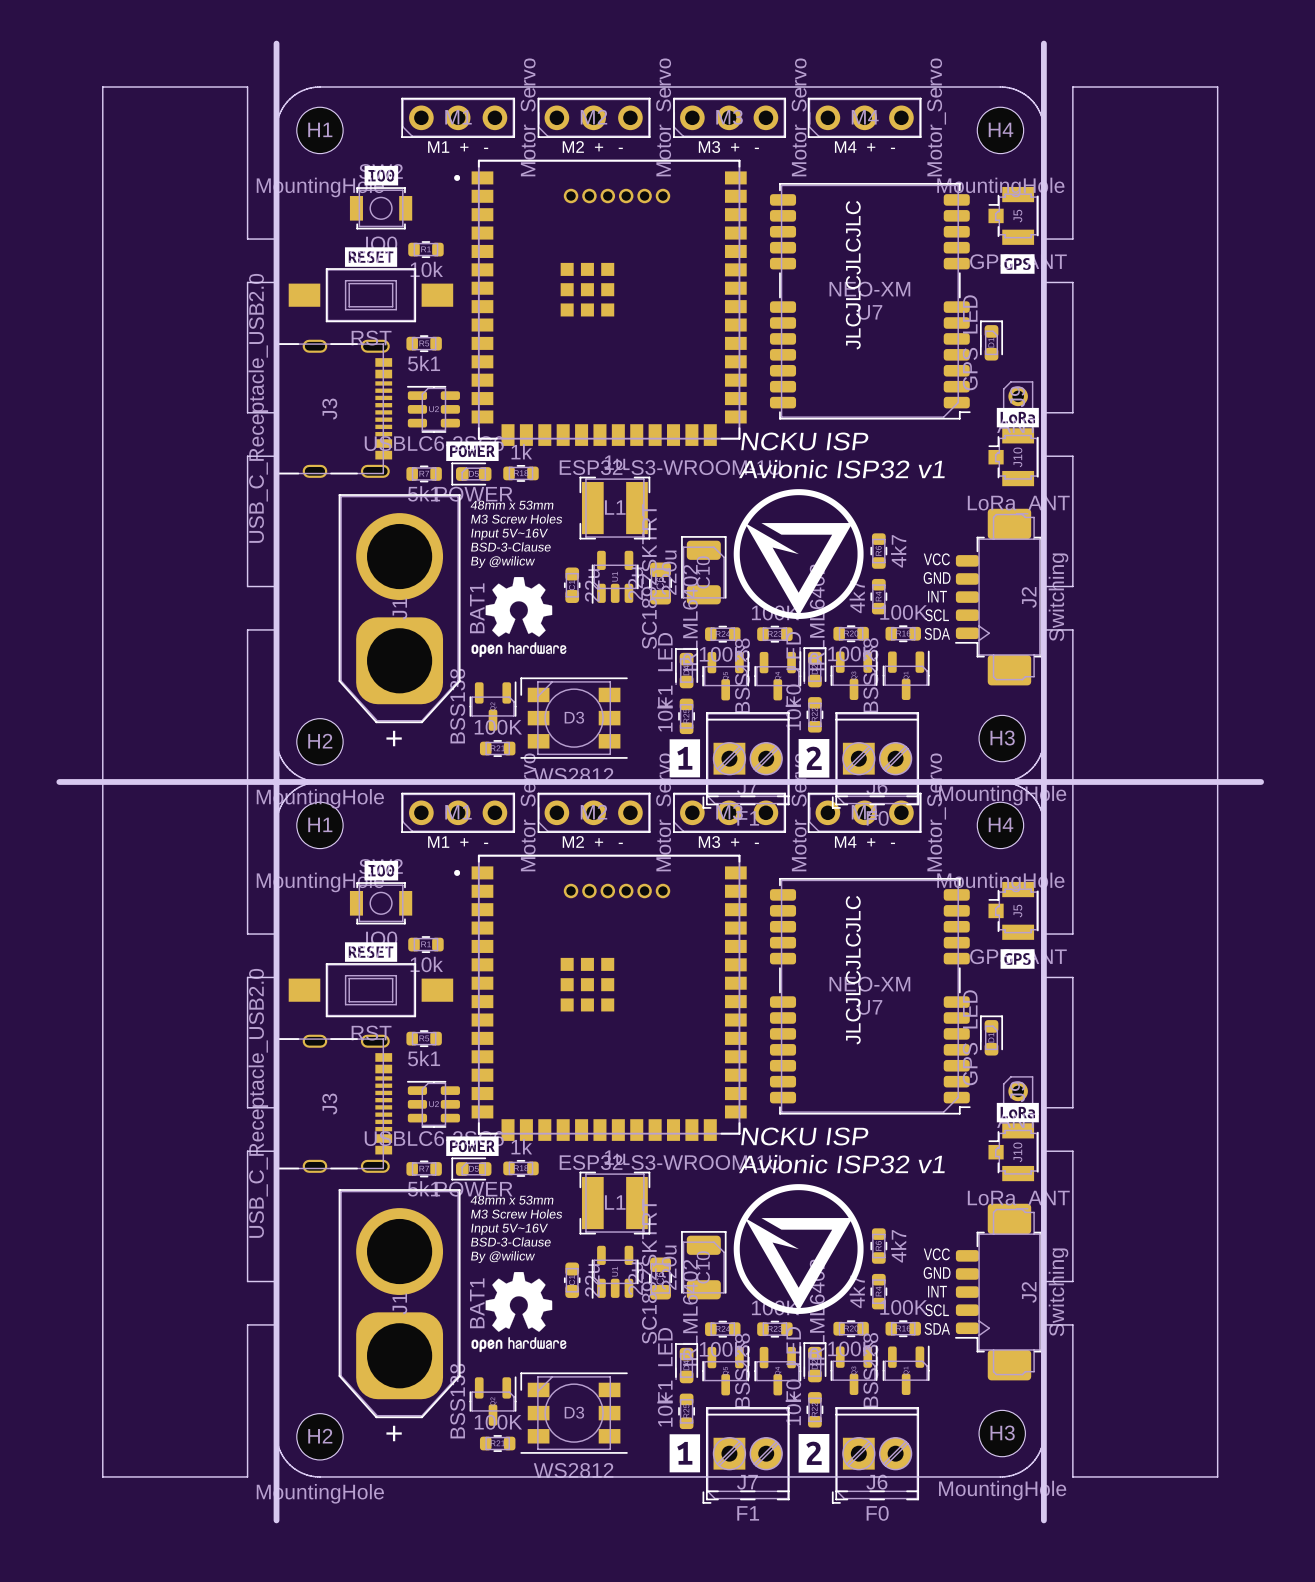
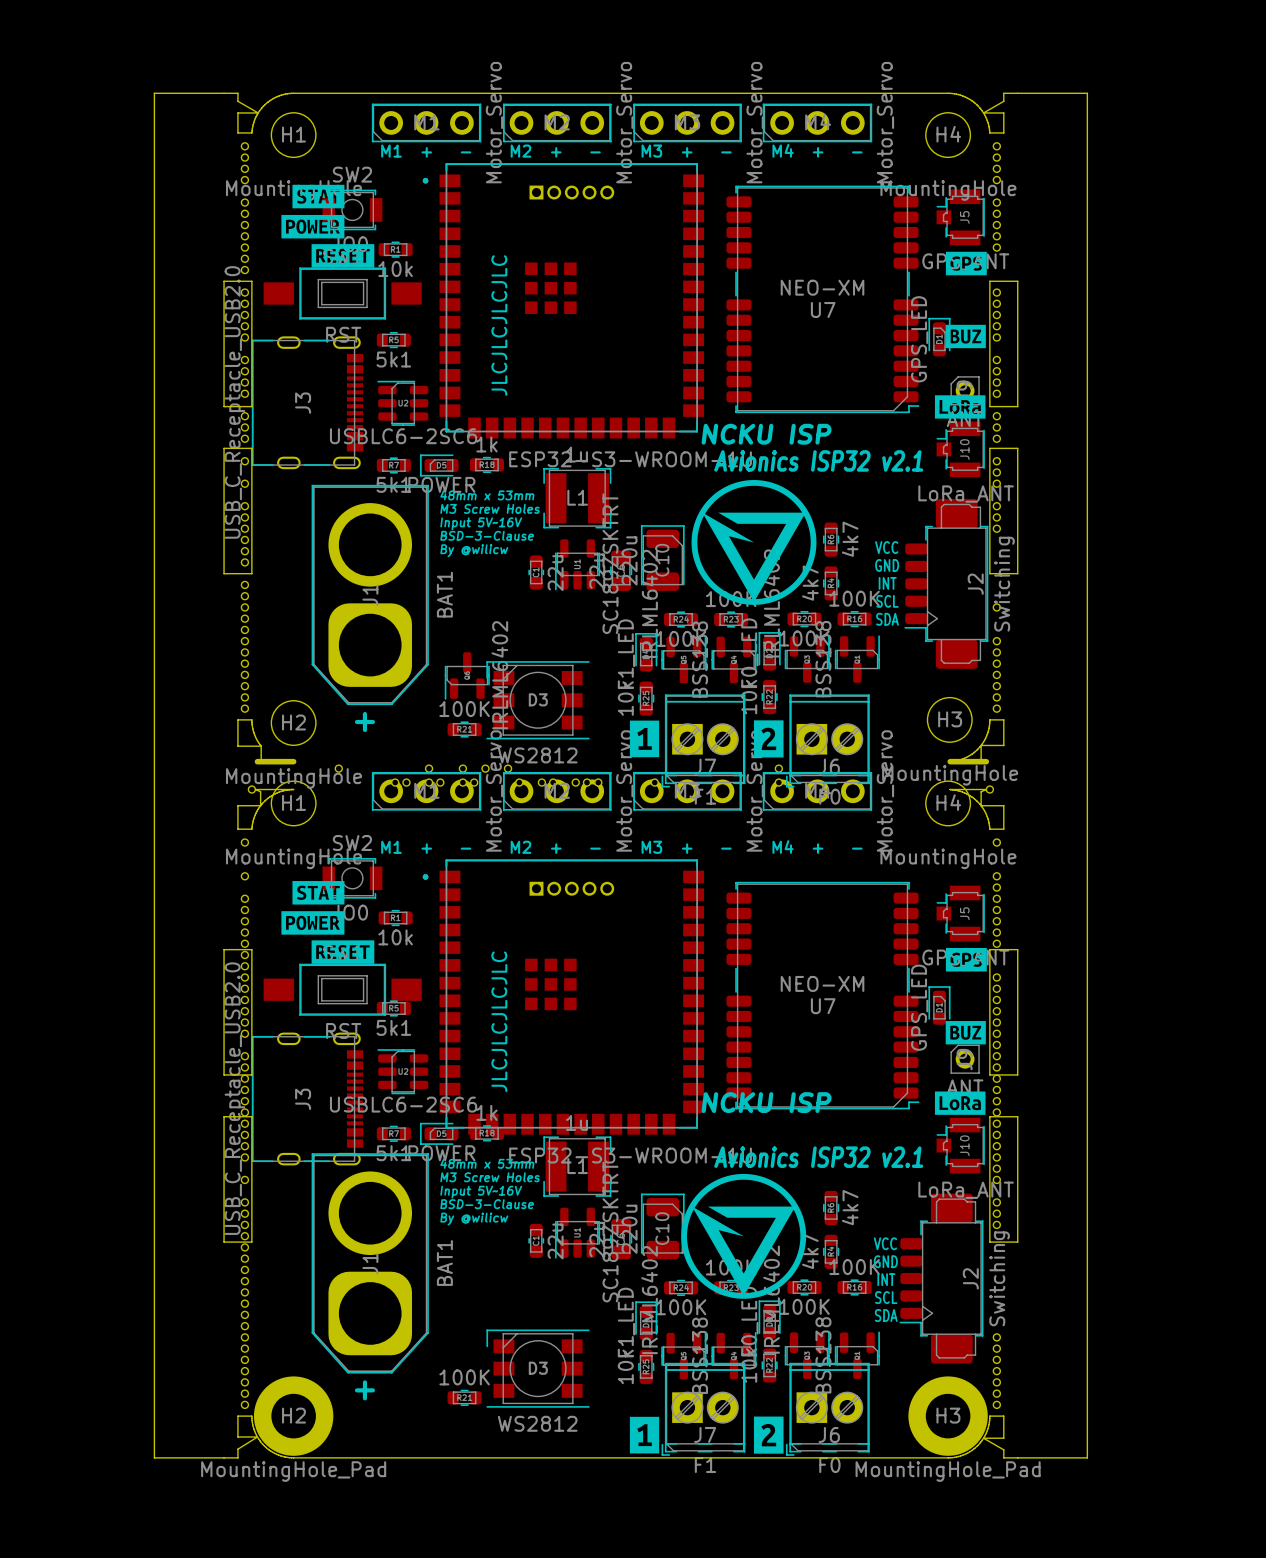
board edge: (276, 43) (276, 1520) -> none
board edge: (1043, 43) (1043, 1520) -> none
board edge: (175, 87) (102, 87) (102, 1476) (247, 1476) (247, 1324) (276, 1324) (277, 1444) (283, 1456) (291, 1466) (302, 1473) (313, 1476) (1009, 1476) (1021, 1471) (1030, 1465) (1038, 1454) (1043, 1442) (1043, 1324) (1072, 1324) (1072, 1476) (1217, 1476) (1217, 87) (1145, 87) -> (154, 93) (154, 1457) (237, 1457) (237, 1449) (257, 1437)
board edge: (247, 87) (247, 239) (276, 239) (276, 128) -> (224, 93) (237, 93) (237, 101) (258, 112) (237, 112) (237, 132) (251, 132)
board edge: (1000, 87) (1013, 89) (1026, 95) (1035, 104) (1042, 119) (1043, 239) (1072, 239) (1072, 87) -> (948, 93) (968, 98) (983, 112)
board edge: none -> (1017, 93) (1003, 93) (1003, 101) (983, 112)
board edge: none -> (1087, 93) (1087, 1457) (1003, 1457) (1003, 1449) (983, 1438)
board edge: none -> (983, 112) (1003, 112) (1003, 132) (989, 132) (983, 112)
part: none -> (244, 146)
part: none -> (996, 146)
part: none -> (244, 157)
part: none -> (996, 157)
part: none -> (244, 168)
drawing: [364, 165, 399, 186] -> none
part: none -> (996, 168)
part: none -> (244, 180)
part: none -> (996, 180)
drawing: none -> [281, 184, 345, 239]
part footprint: [563, 188, 671, 204] -> [529, 185, 615, 200]
part: none -> (244, 202)
part: none -> (996, 202)
part: none -> (244, 213)
part: none -> (996, 213)
part: none -> (244, 225)
part: none -> (996, 225)
part: none -> (244, 236)
part: none -> (996, 236)
part: none -> (244, 247)
drawing shape: [344, 247, 398, 267] -> [311, 244, 375, 268]
part: none -> (996, 247)
drawing shape: [1000, 254, 1035, 274] -> [945, 251, 987, 276]
part: none -> (244, 258)
part: none -> (244, 270)
text position: JLCJLCJLCJLC (853, 275) -> JLCJLCJLCJLC (499, 325)
part: none -> (244, 292)
part: none -> (996, 292)
part: none -> (244, 303)
part: none -> (996, 303)
part: none -> (244, 315)
part: none -> (996, 315)
drawing: none -> [945, 324, 986, 349]
part: none -> (244, 326)
part: none -> (996, 326)
part: none -> (244, 337)
part: none -> (996, 337)
part: none -> (244, 360)
part: none -> (996, 360)
part: none -> (244, 371)
part: none -> (996, 371)
part: none -> (244, 382)
part: none -> (996, 382)
part: none -> (244, 393)
part: none -> (996, 393)
drawing shape: [996, 407, 1039, 428] -> [934, 395, 986, 419]
part: none -> (244, 416)
part: none -> (996, 416)
part: none -> (244, 427)
part: none -> (996, 427)
drawing: [446, 441, 499, 461] -> none
part: none -> (244, 438)
part: none -> (996, 438)
part: none -> (244, 461)
text: Avionic ISP32 v1 (841, 469) -> Avionics ISP32 v2.1 (818, 460)
part: none -> (996, 461)
part: none -> (996, 472)
part: none -> (244, 483)
part: none -> (996, 483)
part: none -> (244, 506)
part: none -> (996, 506)
part: none -> (244, 517)
part: none -> (996, 517)
part: none -> (244, 528)
part: none -> (996, 528)
part: none -> (244, 539)
part: none -> (244, 551)
part: none -> (244, 562)
drawing: [471, 577, 567, 658] -> none
part: none -> (244, 584)
part: none -> (244, 596)
part: none -> (244, 607)
part: none -> (996, 607)
board edge: (247, 629) (247, 934) (276, 934) (277, 814) (284, 800) (293, 791) (304, 784) (317, 782) (302, 778) (291, 771) (283, 761) (277, 749) (276, 629) (247, 629) -> none
part: none -> (244, 618)
part: none -> (244, 629)
part: none -> (244, 641)
part: none -> (996, 641)
part: none -> (244, 652)
part: none -> (996, 652)
part: none -> (244, 663)
part: none -> (996, 663)
part: none -> (244, 674)
part: none -> (996, 674)
part: none -> IRLML6402 (467, 675)
part: none -> (244, 686)
part: none -> (996, 686)
part: BSS138 (493, 706) -> none
part: none -> (244, 697)
part: none -> (996, 697)
part: none -> (244, 708)
part: none -> (996, 708)
board edge: (1043, 738) (1043, 629) (1072, 629) (1072, 934) (1043, 934) (1042, 816) (1039, 805) (1031, 794) (1020, 786) (1009, 782) (319, 781) (408, 781) -> none
board edge: none -> (261, 746) (237, 746) (237, 719) (251, 719) (253, 732) (261, 746)
board edge: (59, 781) (282, 781) -> (261, 746) (261, 760) (257, 761)
board edge: (1040, 781) (1261, 781) -> (986, 761) (981, 759) (981, 745) (1003, 745) (1003, 719) (989, 719)
part: none -> (338, 768)
part: none -> (429, 768)
part: none -> (462, 768)
part: none -> (485, 768)
part: none -> (508, 768)
part: none -> (778, 768)
part: none -> (395, 782)
part: none -> (406, 782)
part: none -> (429, 782)
part: none -> (440, 782)
part: none -> (462, 782)
part: none -> (474, 782)
part: none -> (519, 782)
part: none -> (541, 782)
part: none -> (553, 782)
part: none -> (575, 782)
part: none -> (587, 782)
part: none -> (598, 782)
part: none -> (654, 782)
part: none -> (778, 782)
part: none -> (251, 789)
part: none -> (989, 789)
board edge: none -> (260, 805) (237, 805) (237, 829) (251, 829) (254, 816) (260, 805)
board edge: none -> (260, 805) (260, 791) (255, 789) (293, 789) (275, 793) (260, 805)
board edge: none -> (981, 805) (1003, 805) (1003, 829) (989, 829) (987, 816) (981, 805)
board edge: none -> (981, 805) (966, 793) (950, 789) (986, 789) (981, 791) (981, 805)
text position: M2 + - (592, 841) -> M2 + - (555, 847)
text position: M1 + - (458, 842) -> M1 + - (426, 847)
text position: M3 + - (728, 842) -> M3 + - (686, 847)
text position: M4 + - (864, 842) -> M4 + - (817, 847)
drawing: [364, 860, 399, 881] -> none
part: none -> (244, 842)
part: none -> (996, 842)
part: (617, 891) -> none
part: none -> (244, 876)
part: none -> (996, 876)
drawing: none -> [281, 881, 375, 964]
J5 position: (1013, 910) -> (960, 913)
part: none -> (996, 887)
part: none -> (571, 888)
part: none -> (244, 898)
part: none -> (996, 898)
part: none -> (244, 910)
part: none -> (996, 910)
drawing: [344, 942, 398, 962] -> none
part: none -> (244, 921)
part: none -> (996, 921)
drawing: [1000, 949, 1035, 969] -> none
part: none -> (244, 932)
part: none -> (996, 932)
text position: JLCJLCJLCJLC (853, 970) -> JLCJLCJLCJLC (499, 1021)
part: none -> (244, 943)
part: none -> (996, 943)
drawing: none -> [945, 948, 987, 972]
part: none -> (244, 955)
part position: (370, 990) -> (342, 989)
part: none -> (244, 966)
U7 position: (870, 996) -> (822, 995)
part position: (600, 997) -> (563, 997)
part: none -> (244, 977)
part: none -> (996, 977)
part: none -> (244, 988)
part: none -> (996, 988)
part: none -> (244, 999)
part: none -> (996, 999)
part: none -> (244, 1011)
part: none -> (996, 1011)
drawing: none -> [945, 1021, 986, 1045]
part: none -> (244, 1022)
part: none -> (996, 1022)
part: none -> (244, 1033)
part: none -> (996, 1033)
part: none -> (996, 1044)
part: none -> (244, 1056)
part: none -> (996, 1056)
part: none -> (244, 1067)
part: none -> (996, 1067)
drawing: [996, 1102, 1039, 1123] -> none
J3 position: (334, 1103) -> (307, 1098)
part: none -> (244, 1078)
part: none -> (996, 1078)
part: none -> (244, 1089)
part: none -> (996, 1089)
drawing: none -> [934, 1091, 986, 1115]
part: none -> (244, 1101)
part: none -> (996, 1101)
drawing: [446, 1136, 499, 1156] -> none
part: none -> (244, 1112)
part: none -> (996, 1112)
J10 position: (1013, 1152) -> (960, 1145)
part: none -> (244, 1123)
part: none -> (996, 1123)
text: Avionic ISP32 v1 (841, 1164) -> Avionics ISP32 v2.1 (818, 1157)
part: none -> (244, 1134)
part: none -> (996, 1134)
part: none -> (244, 1146)
part: none -> (996, 1146)
part: none -> (244, 1157)
part: none -> (996, 1157)
part: none -> (996, 1168)
part: none -> (244, 1179)
part: none -> (996, 1179)
part: none -> (244, 1202)
part: none -> (996, 1202)
drawing position: (798, 1249) -> (743, 1236)
part: none -> (244, 1213)
part: none -> (996, 1213)
text position: VCC (936, 1254) -> VCC (885, 1243)
part: none -> (244, 1224)
part: none -> (996, 1224)
drawing: [471, 1271, 567, 1353] -> none
text position: GND (937, 1272) -> GND (885, 1261)
part: none -> (244, 1236)
part: none -> (244, 1247)
text position: INT (937, 1291) -> INT (886, 1279)
J2 position: (998, 1292) -> (941, 1278)
part: none -> (244, 1258)
part: none -> (244, 1269)
text position: SCL (937, 1310) -> SCL (886, 1297)
part: none -> (244, 1281)
text position: SDA (937, 1328) -> SDA (886, 1315)
part: none -> (244, 1292)
part: none -> (244, 1303)
part: none -> (244, 1314)
part: none -> (244, 1326)
part position: (725, 1370) -> (683, 1355)
part position: (777, 1370) -> (733, 1355)
part position: (854, 1370) -> (807, 1355)
part position: (906, 1370) -> (857, 1355)
part: none -> (244, 1337)
part: none -> (996, 1337)
part: none -> (244, 1348)
part: none -> (996, 1348)
part: BSS138 (493, 1401) -> none
part: none -> (244, 1359)
part: none -> (996, 1359)
part: none -> (244, 1371)
part: none -> (996, 1371)
part: none -> (244, 1382)
part: none -> (996, 1382)
H3: MountingHole (1002, 1433) -> none
H2: MountingHole (319, 1436) -> none
part: none -> (244, 1393)
part: none -> (996, 1393)
part: none -> (244, 1404)
part: none -> (996, 1404)
drawing position: (684, 1453) -> (644, 1435)
drawing position: (813, 1453) -> (768, 1435)
H2: none -> MountingHole_Pad (293, 1416)
H3: none -> MountingHole_Pad (948, 1416)
board edge: none -> (257, 1437) (251, 1416) (237, 1416) (237, 1437) (257, 1437)
board edge: none -> (257, 1437) (272, 1452) (293, 1457) (950, 1457) (970, 1451) (983, 1438)
board edge: none -> (983, 1438) (1003, 1438) (1003, 1416) (989, 1416) (987, 1428) (983, 1438)

